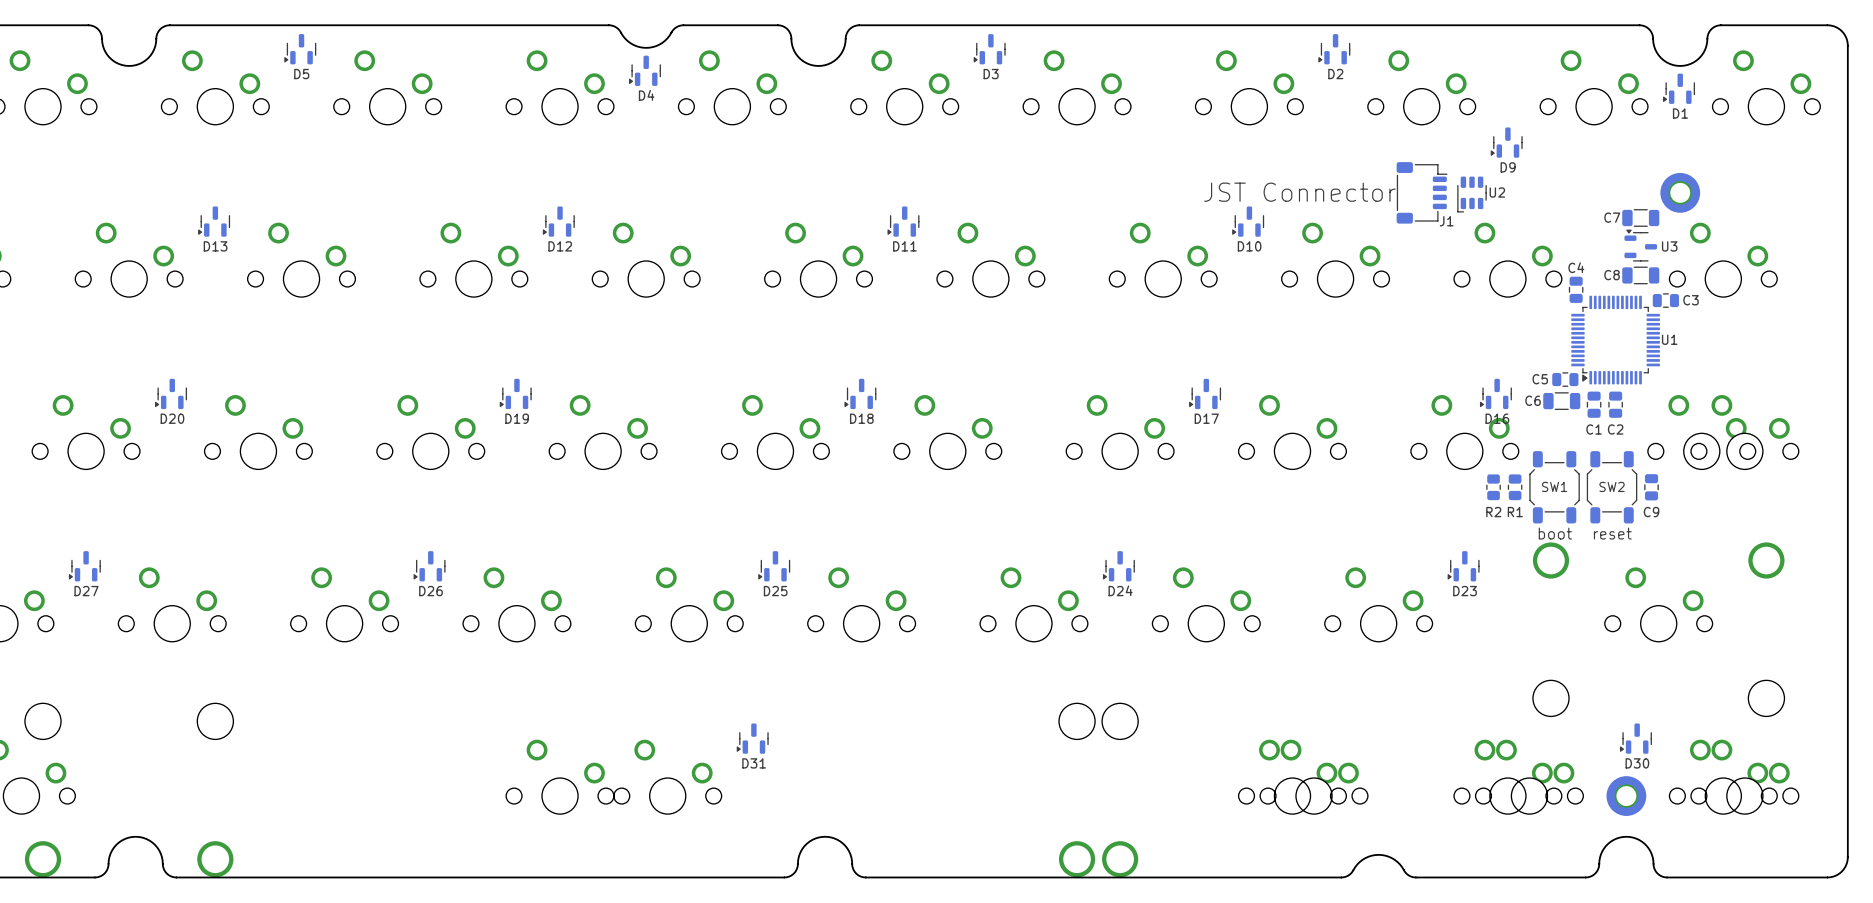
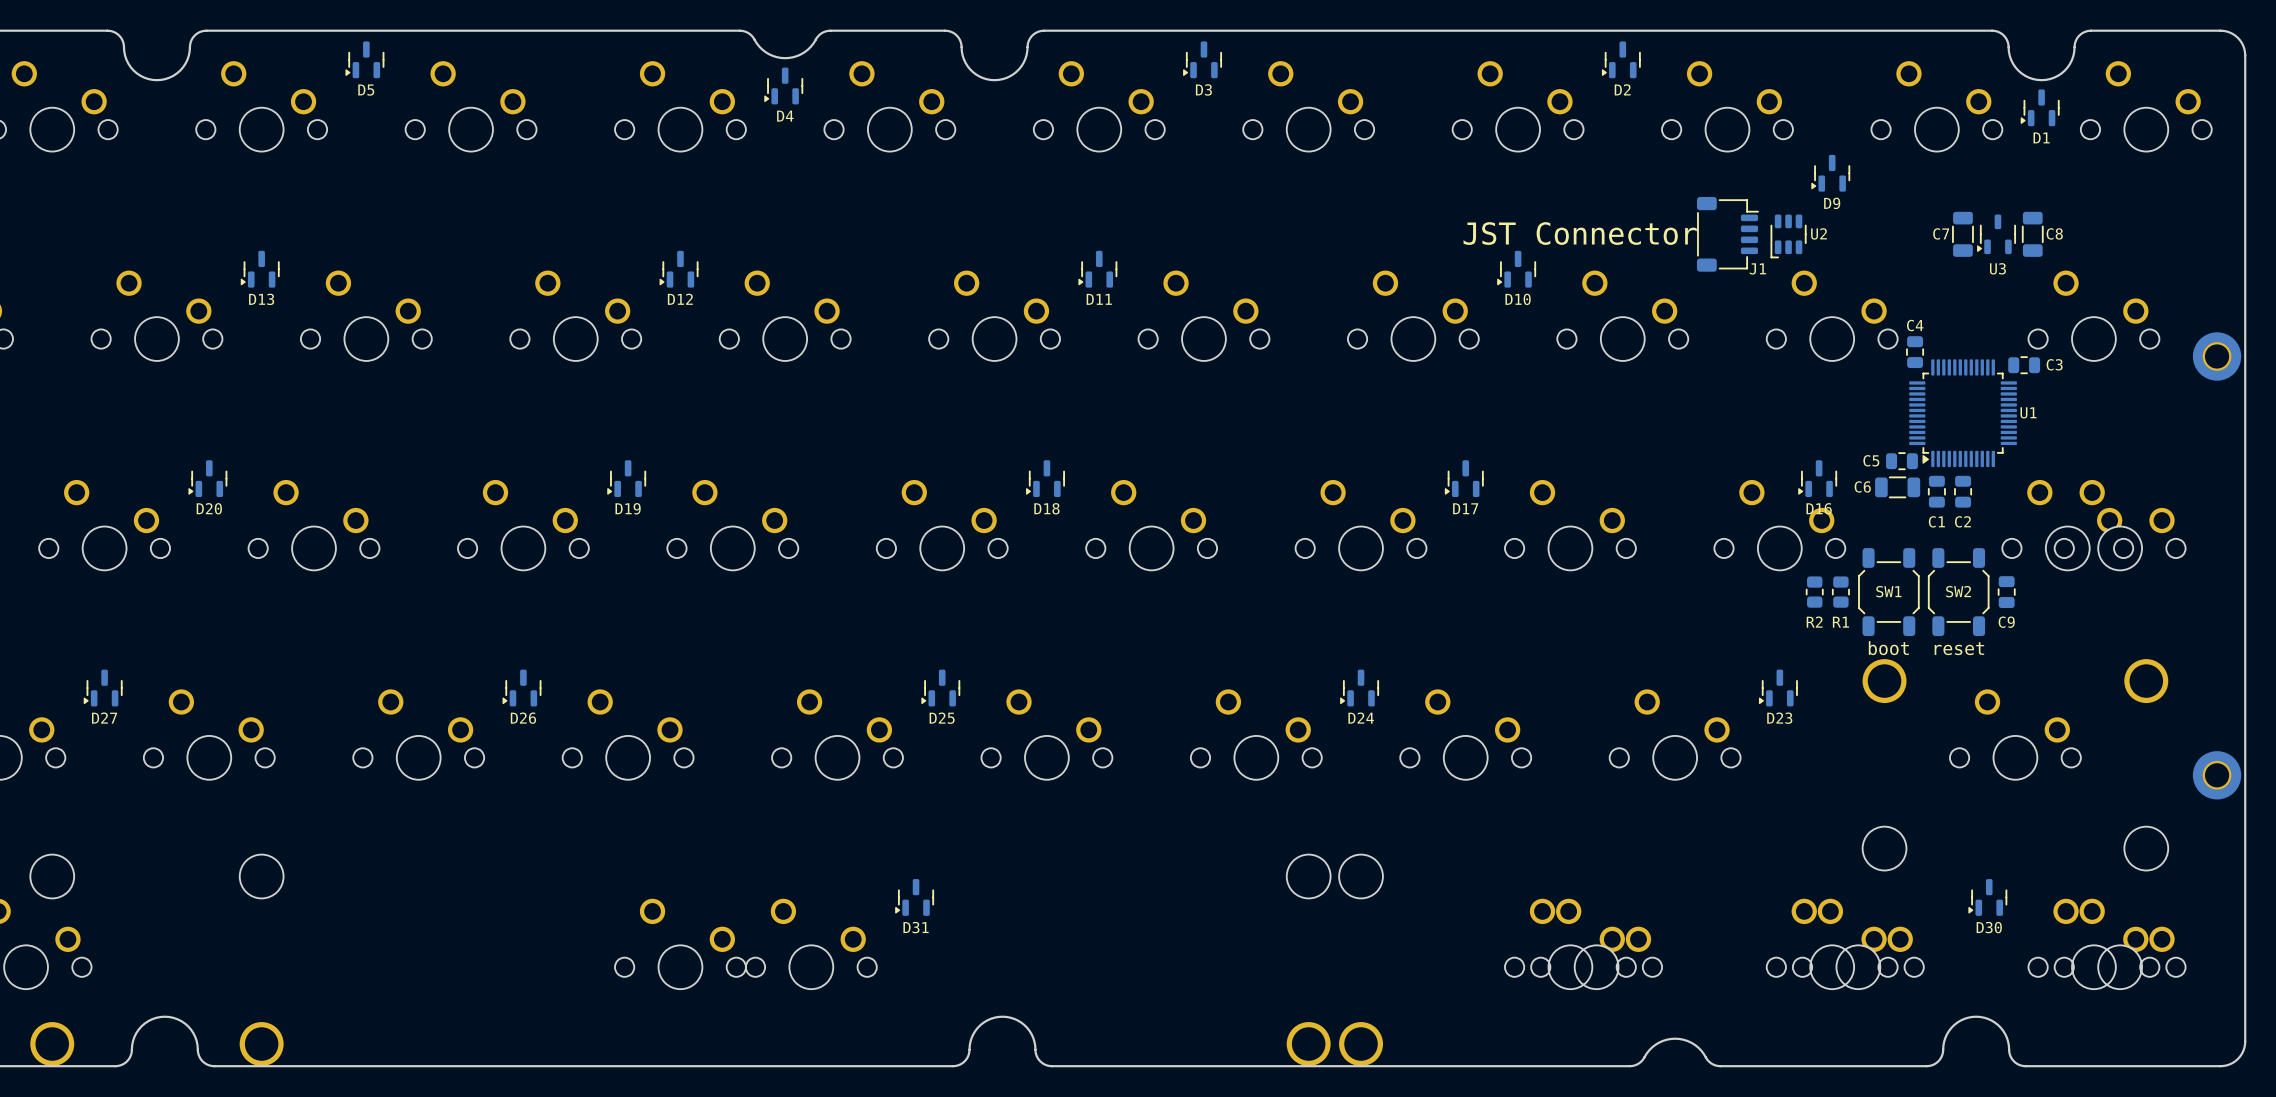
part position: (1680, 192) -> (2217, 356)
C7 rotation: 0° (1640, 217) -> 90° clockwise (1962, 234)
C7 position: (1640, 217) -> (1962, 234)
U3 rotation: 0° (1640, 245) -> 90° counterclockwise (1996, 234)
U3 position: (1640, 245) -> (1996, 234)
U3 name position: U3 (1669, 246) -> U3 (1997, 268)
C8 name position: C8 (1612, 275) -> C8 (2054, 233)
C8 rotation: 0° (1640, 275) -> 90° clockwise (2032, 234)
C8 position: (1640, 275) -> (2032, 234)
part: none -> (2217, 775)
part: (1626, 796) -> none

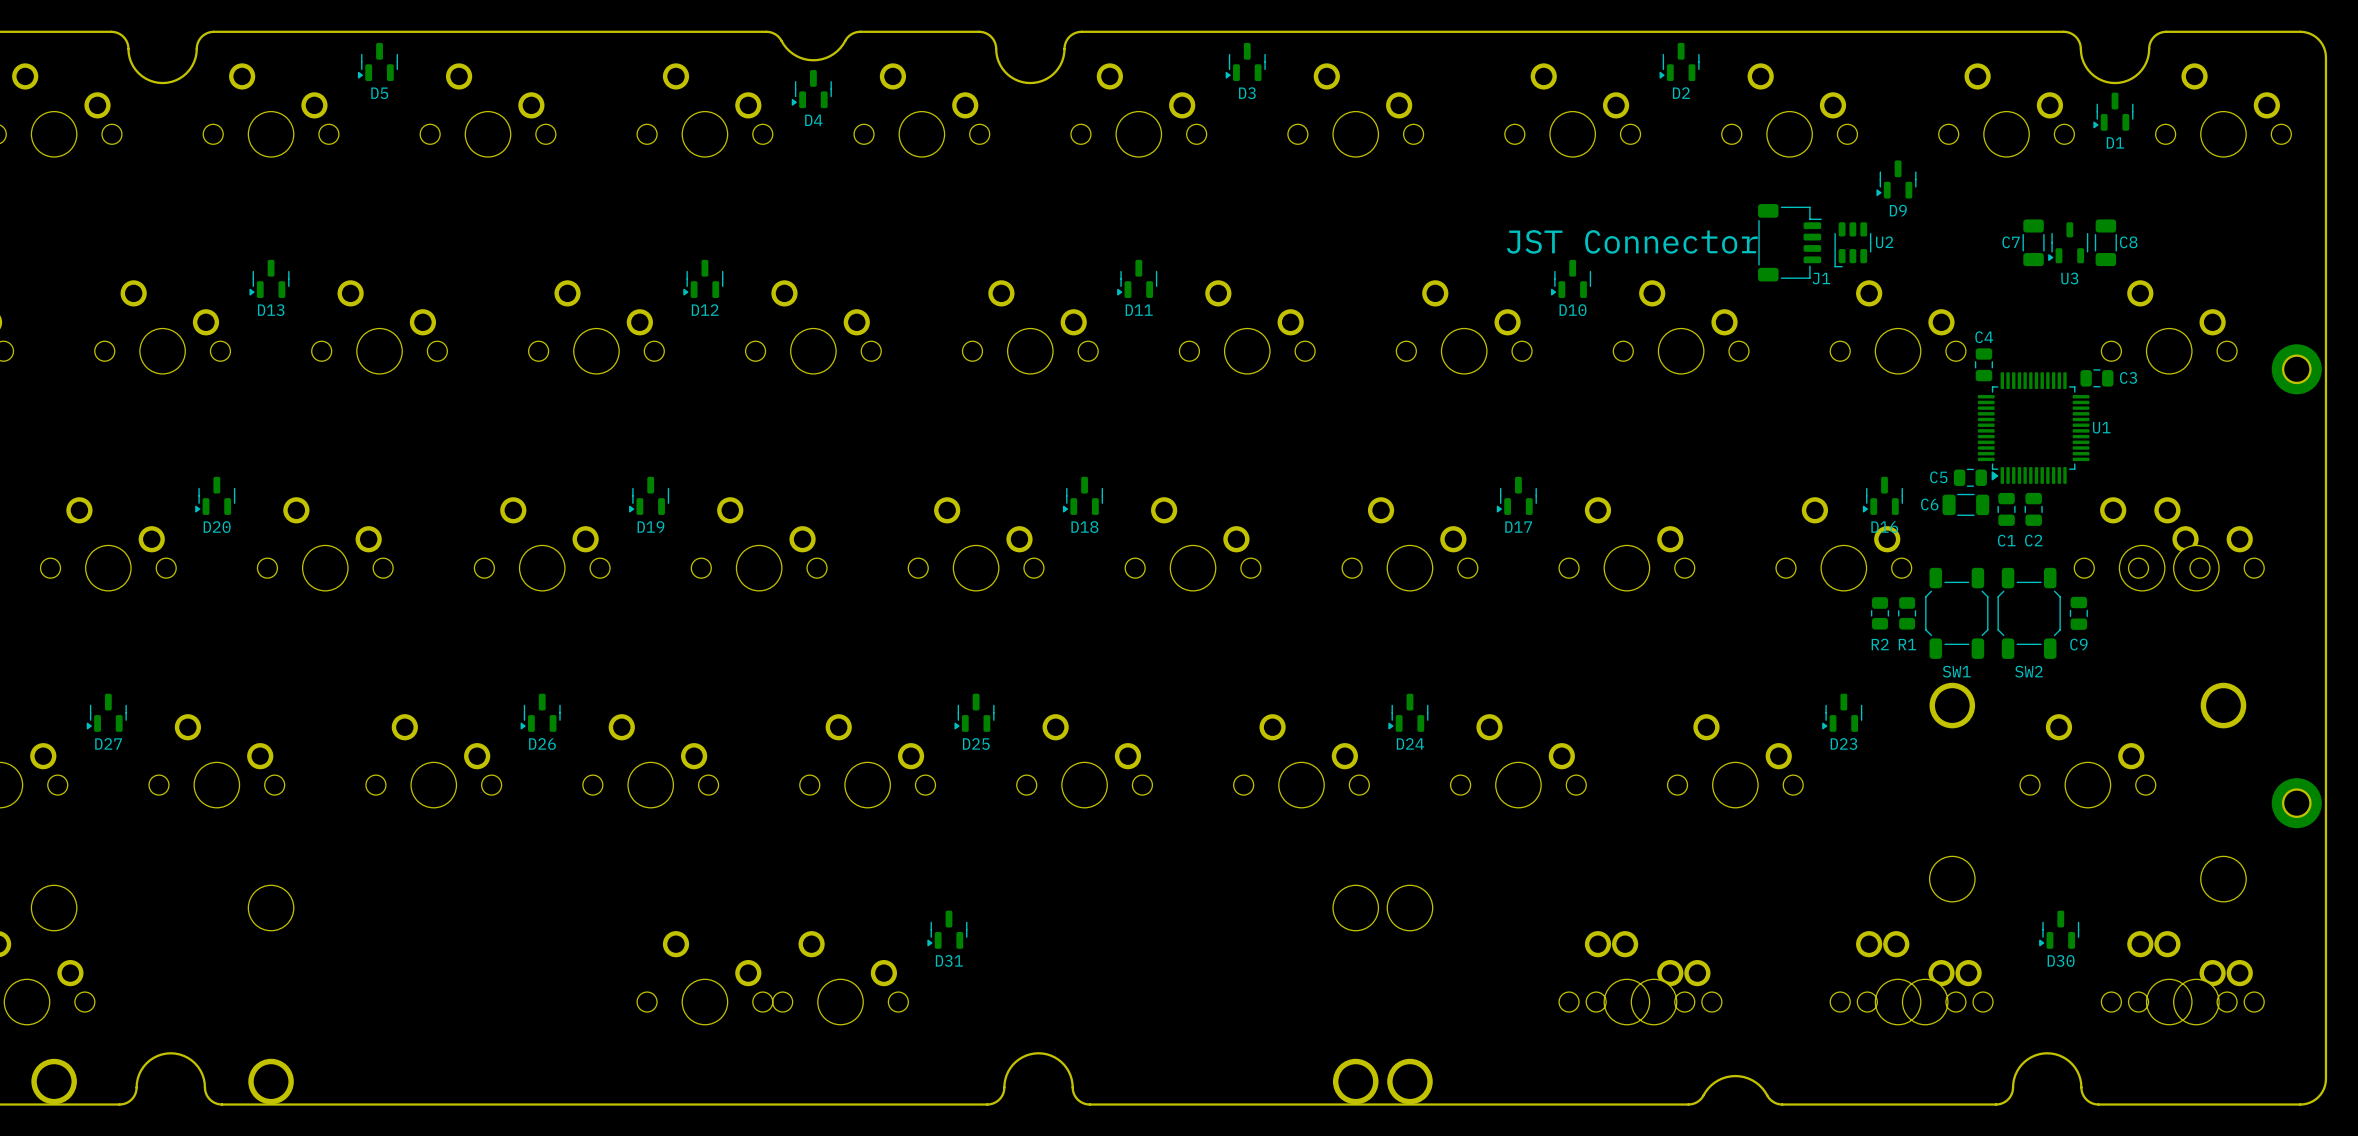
SW1 name position: SW1 (1888, 591) -> SW1 (1956, 671)
SW2 name position: SW2 (1958, 591) -> SW2 (2028, 671)
text: boot (1888, 648) -> none
text: reset (1959, 648) -> none

